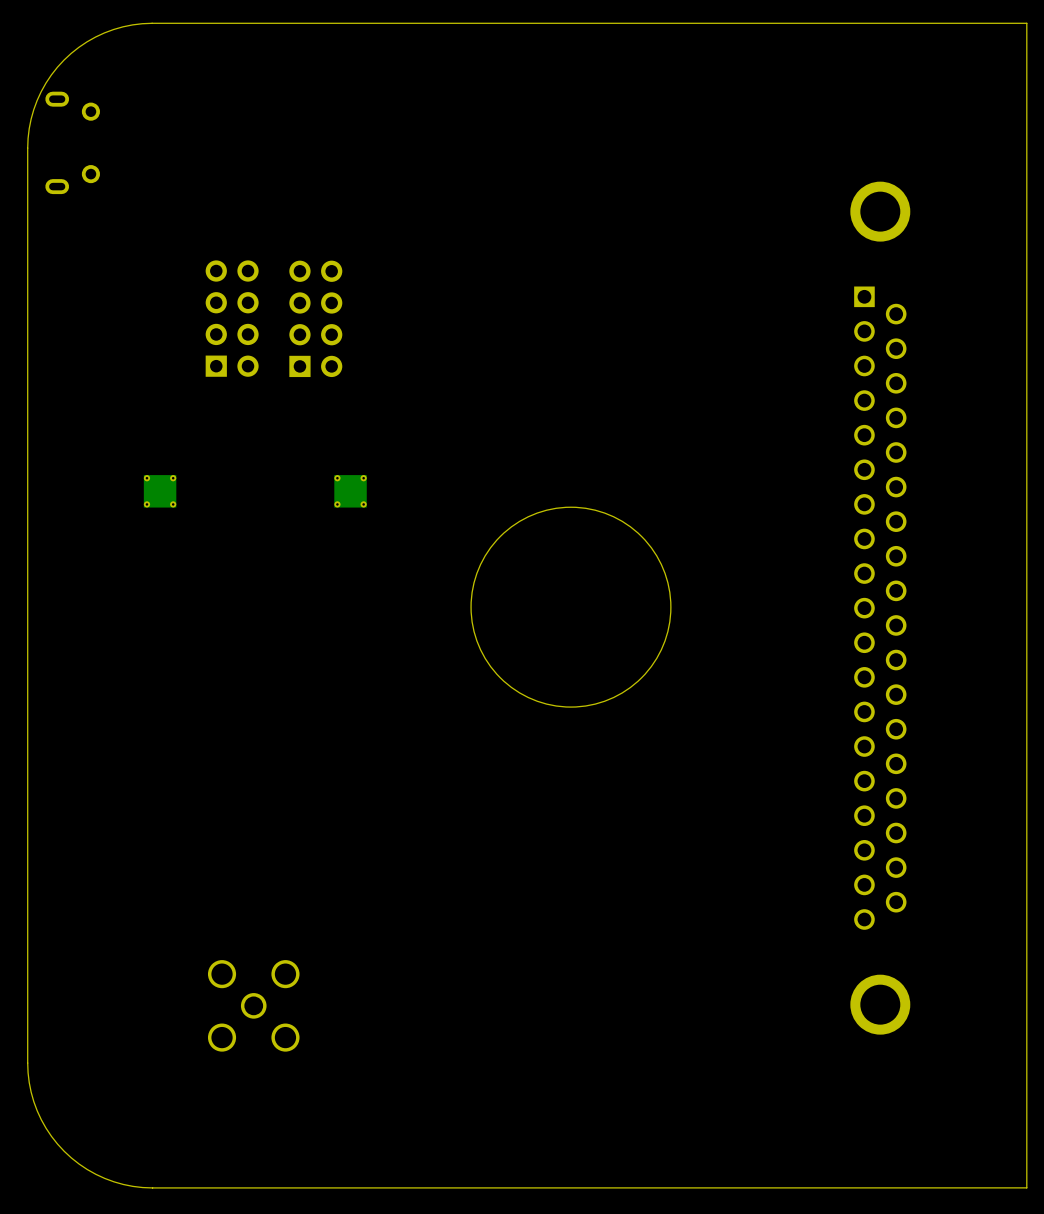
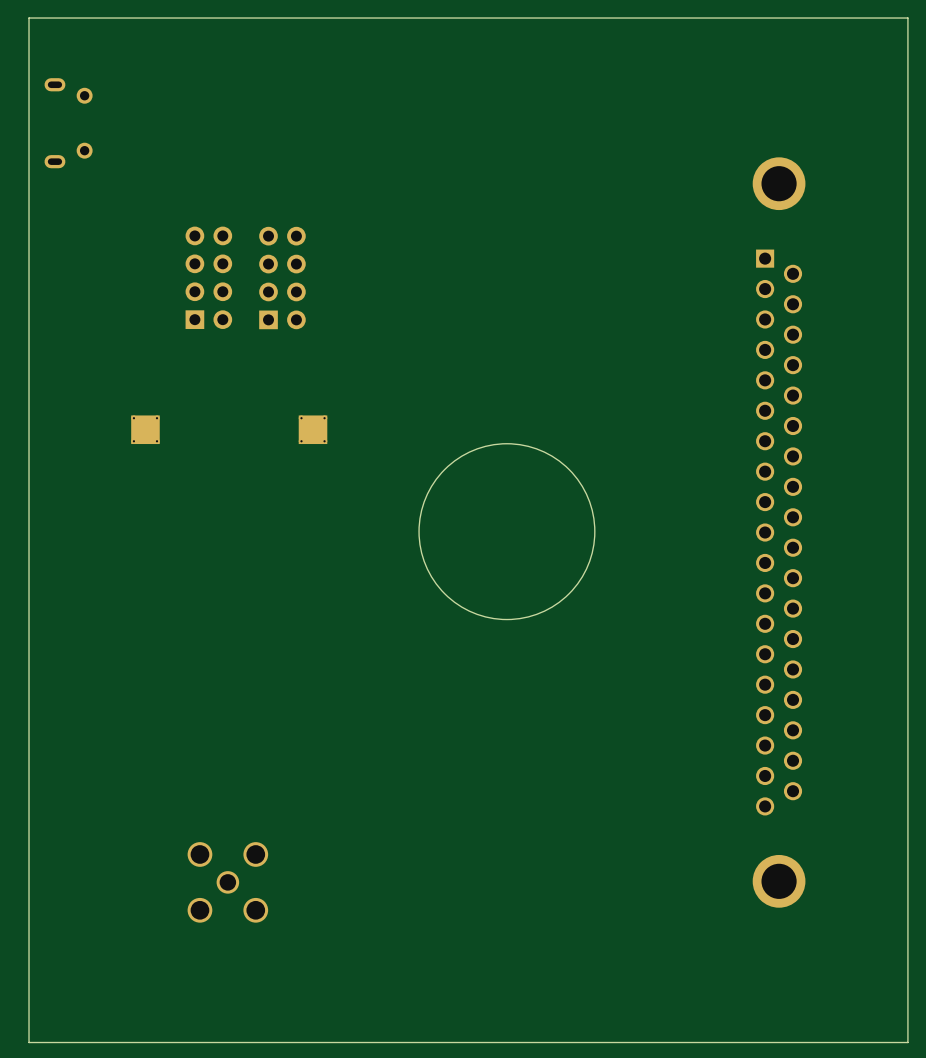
board edge: (152, 23) (123, 26) (104, 32) (78, 47) (64, 60) (51, 74) (37, 100) (29, 128) (27, 148) -> (138, 18) (29, 18) (29, 127)
board edge: (27, 1063) (29, 1082) (37, 1110) (51, 1136) (64, 1151) (79, 1164) (104, 1178) (133, 1186) (152, 1187) -> (29, 932) (29, 1042) (138, 1042)

